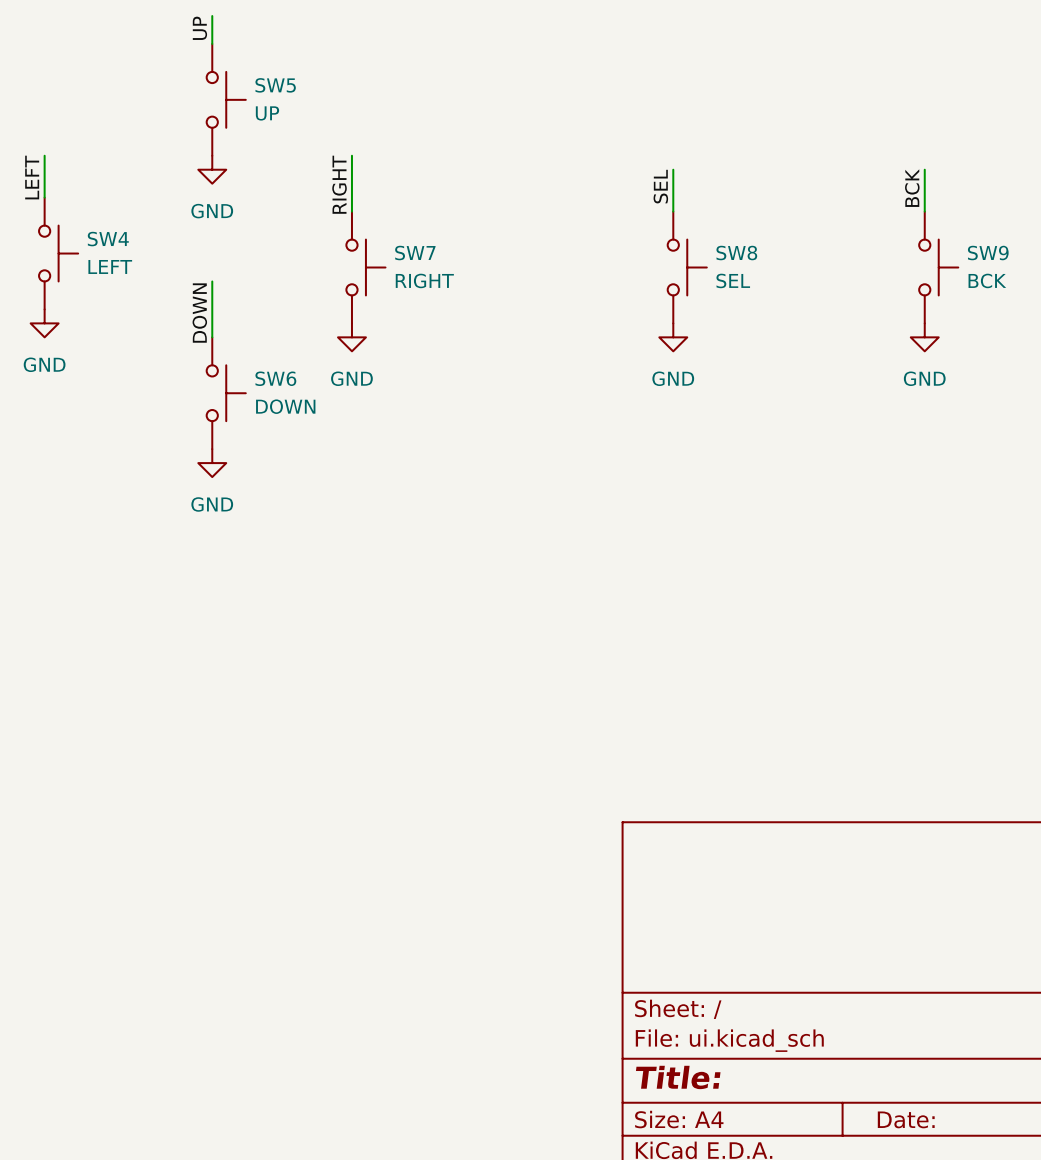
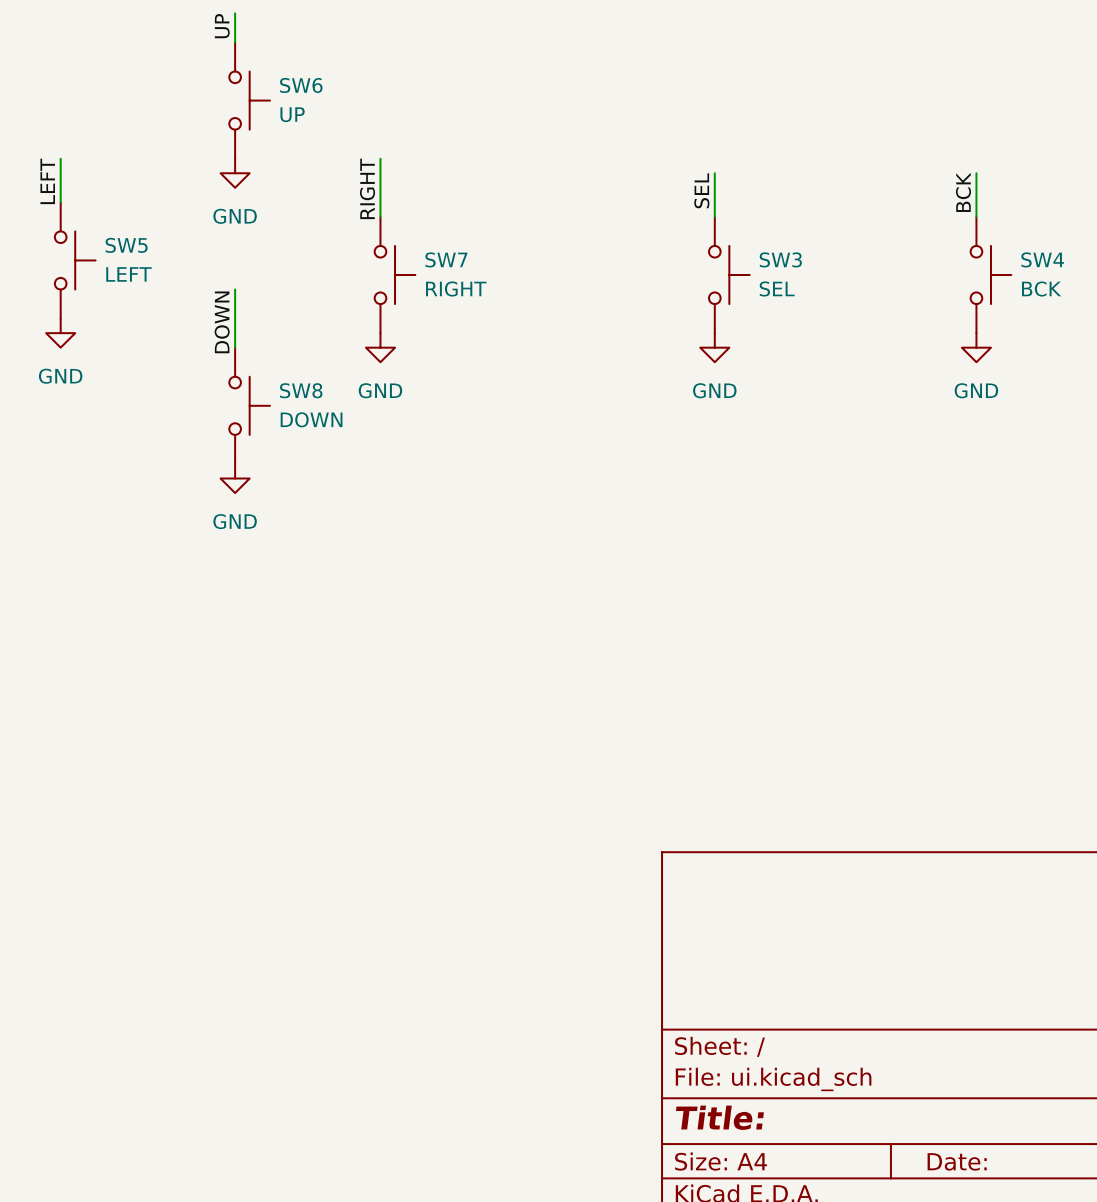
SW5 name: SW5 (275, 85) -> SW6 (301, 85)
SW4 name: SW4 (108, 239) -> SW5 (126, 245)
SW8 name: SW8 (736, 253) -> SW3 (780, 259)
SW9 name: SW9 (988, 253) -> SW4 (1042, 259)
SW6 name: SW6 (275, 378) -> SW8 (301, 390)

